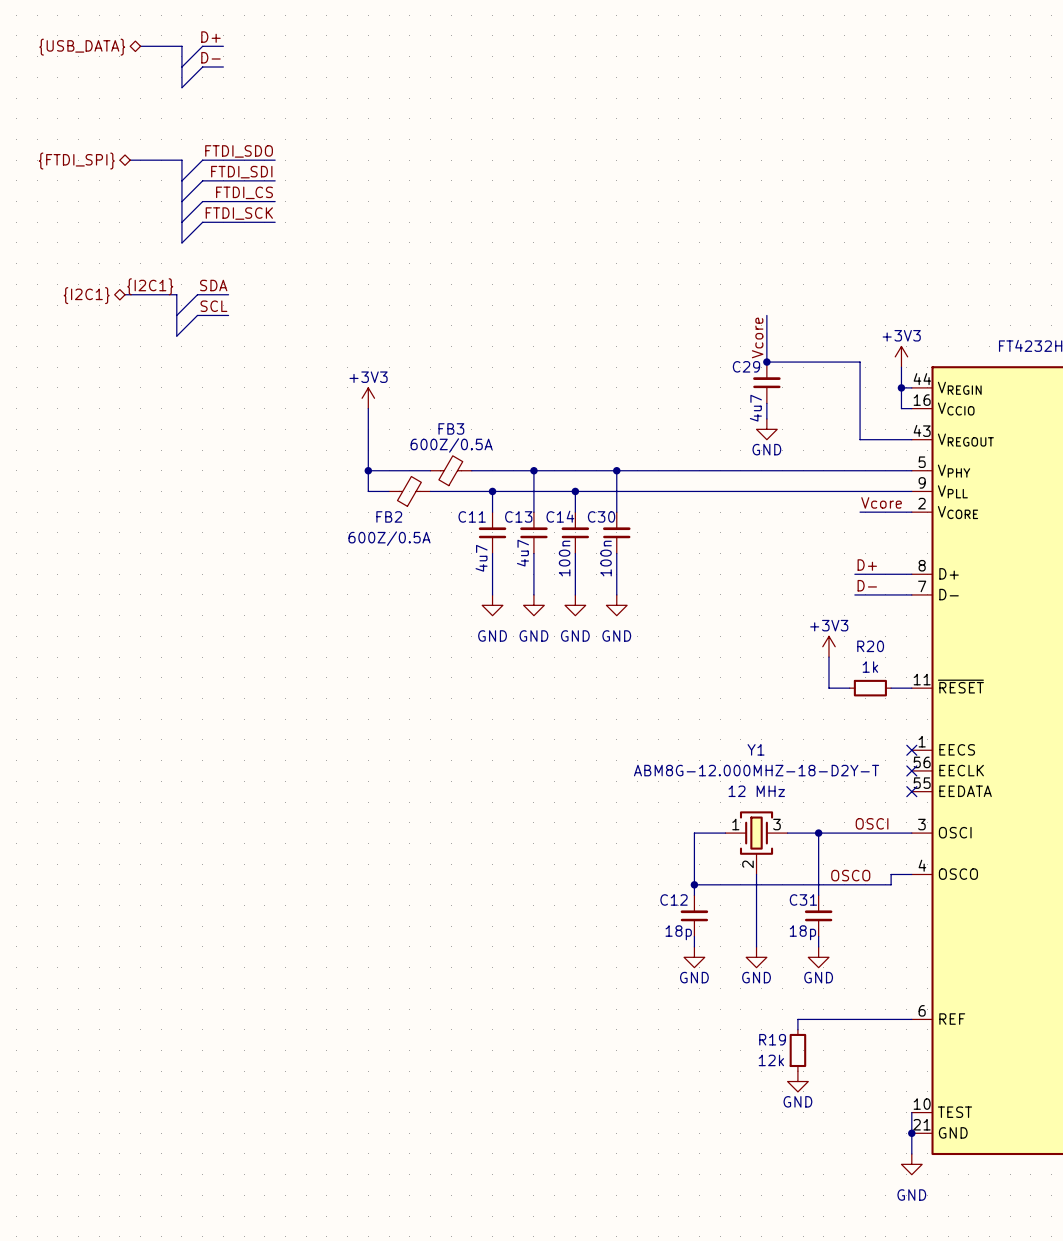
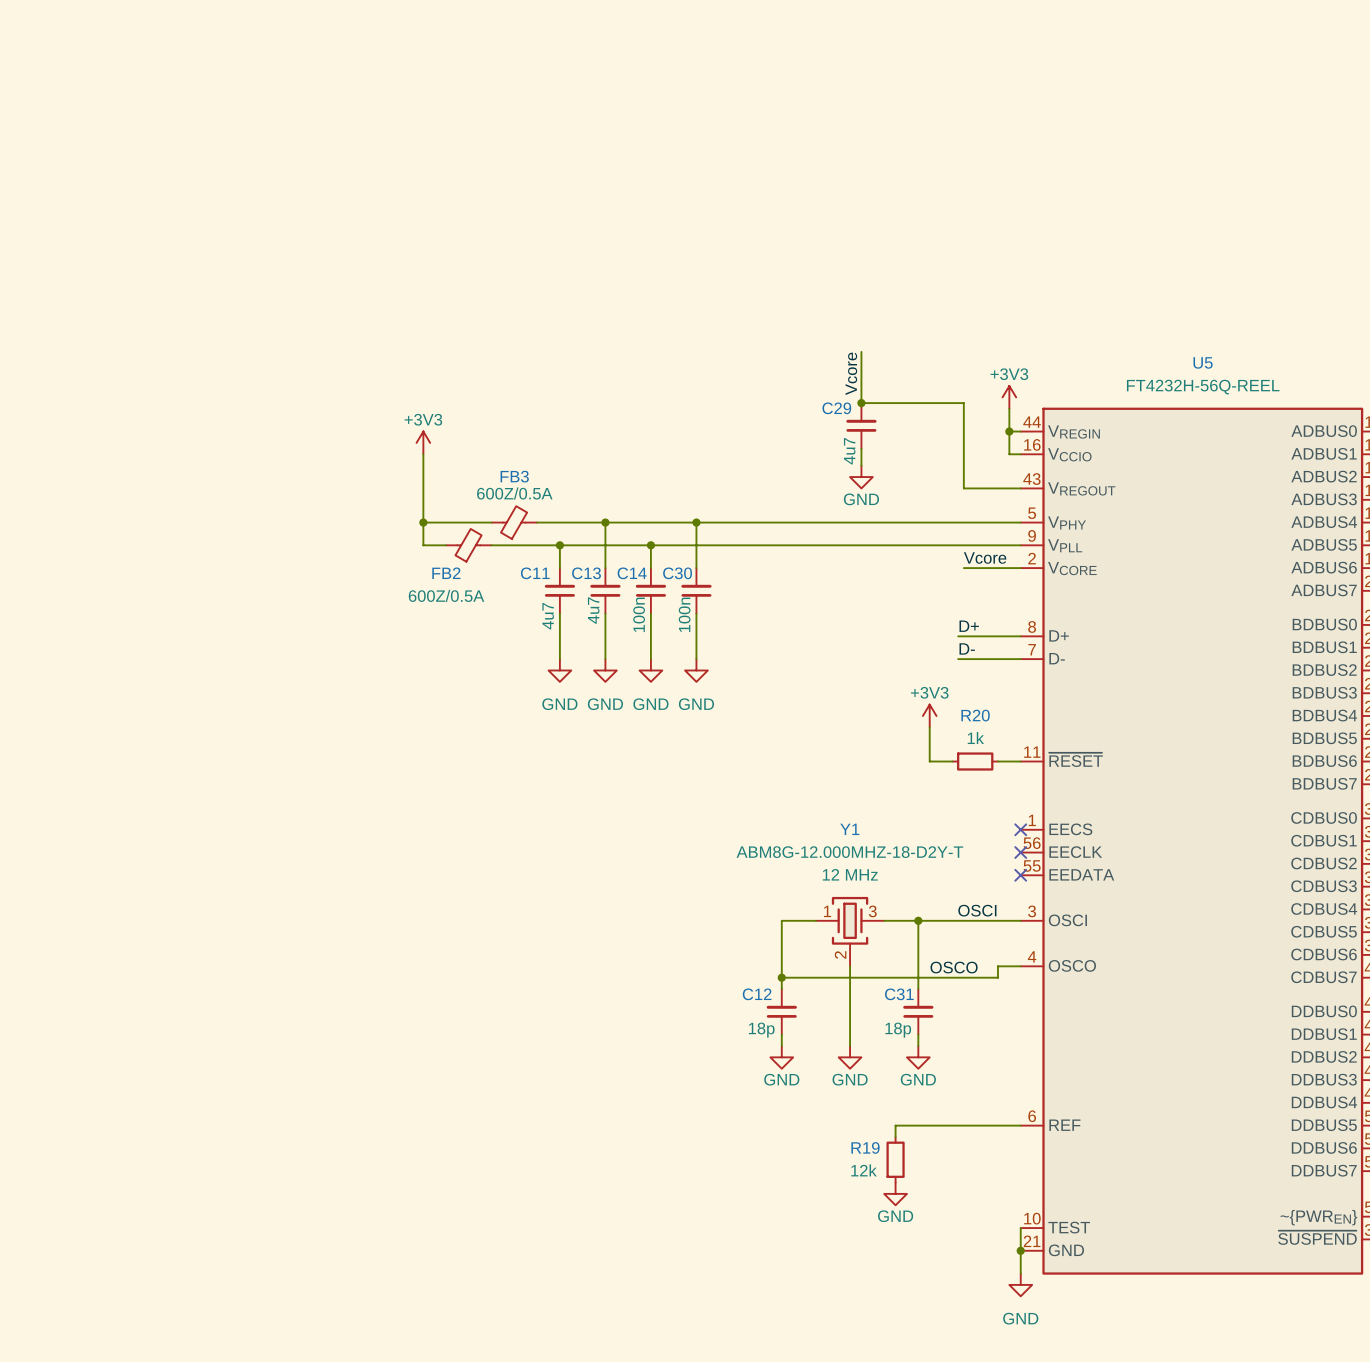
label: D+ (210, 37) -> none
bus: (140, 46) (181, 46) (181, 87) -> none
wire: (223, 46) (202, 46) (181, 67) -> none
hierarchical label: {USB_DATA} (82, 47) -> none
label: D- (210, 57) -> none
wire: (223, 67) (202, 67) (181, 87) -> none
label: FTDI_SDO (239, 151) -> none
bus: (130, 160) (181, 160) (181, 242) -> none
wire: (275, 160) (202, 160) (181, 180) -> none
hierarchical label: {FTDI_SPI} (76, 161) -> none
label: FTDI_SDI (241, 172) -> none
wire: (275, 180) (202, 180) (181, 201) -> none
label: FTDI_CS (244, 192) -> none
wire: (275, 201) (202, 201) (181, 222) -> none
label: FTDI_SCK (239, 213) -> none
wire: (275, 222) (202, 222) (181, 242) -> none
label: SDA (213, 285) -> none
label: {I2C1} (150, 286) -> none
bus: (125, 294) (176, 294) (176, 336) -> none
wire: (228, 294) (197, 294) (176, 315) -> none
hierarchical label: {I2C1} (86, 295) -> none
label: SCL (213, 306) -> none
wire: (228, 315) (197, 315) (176, 336) -> none

